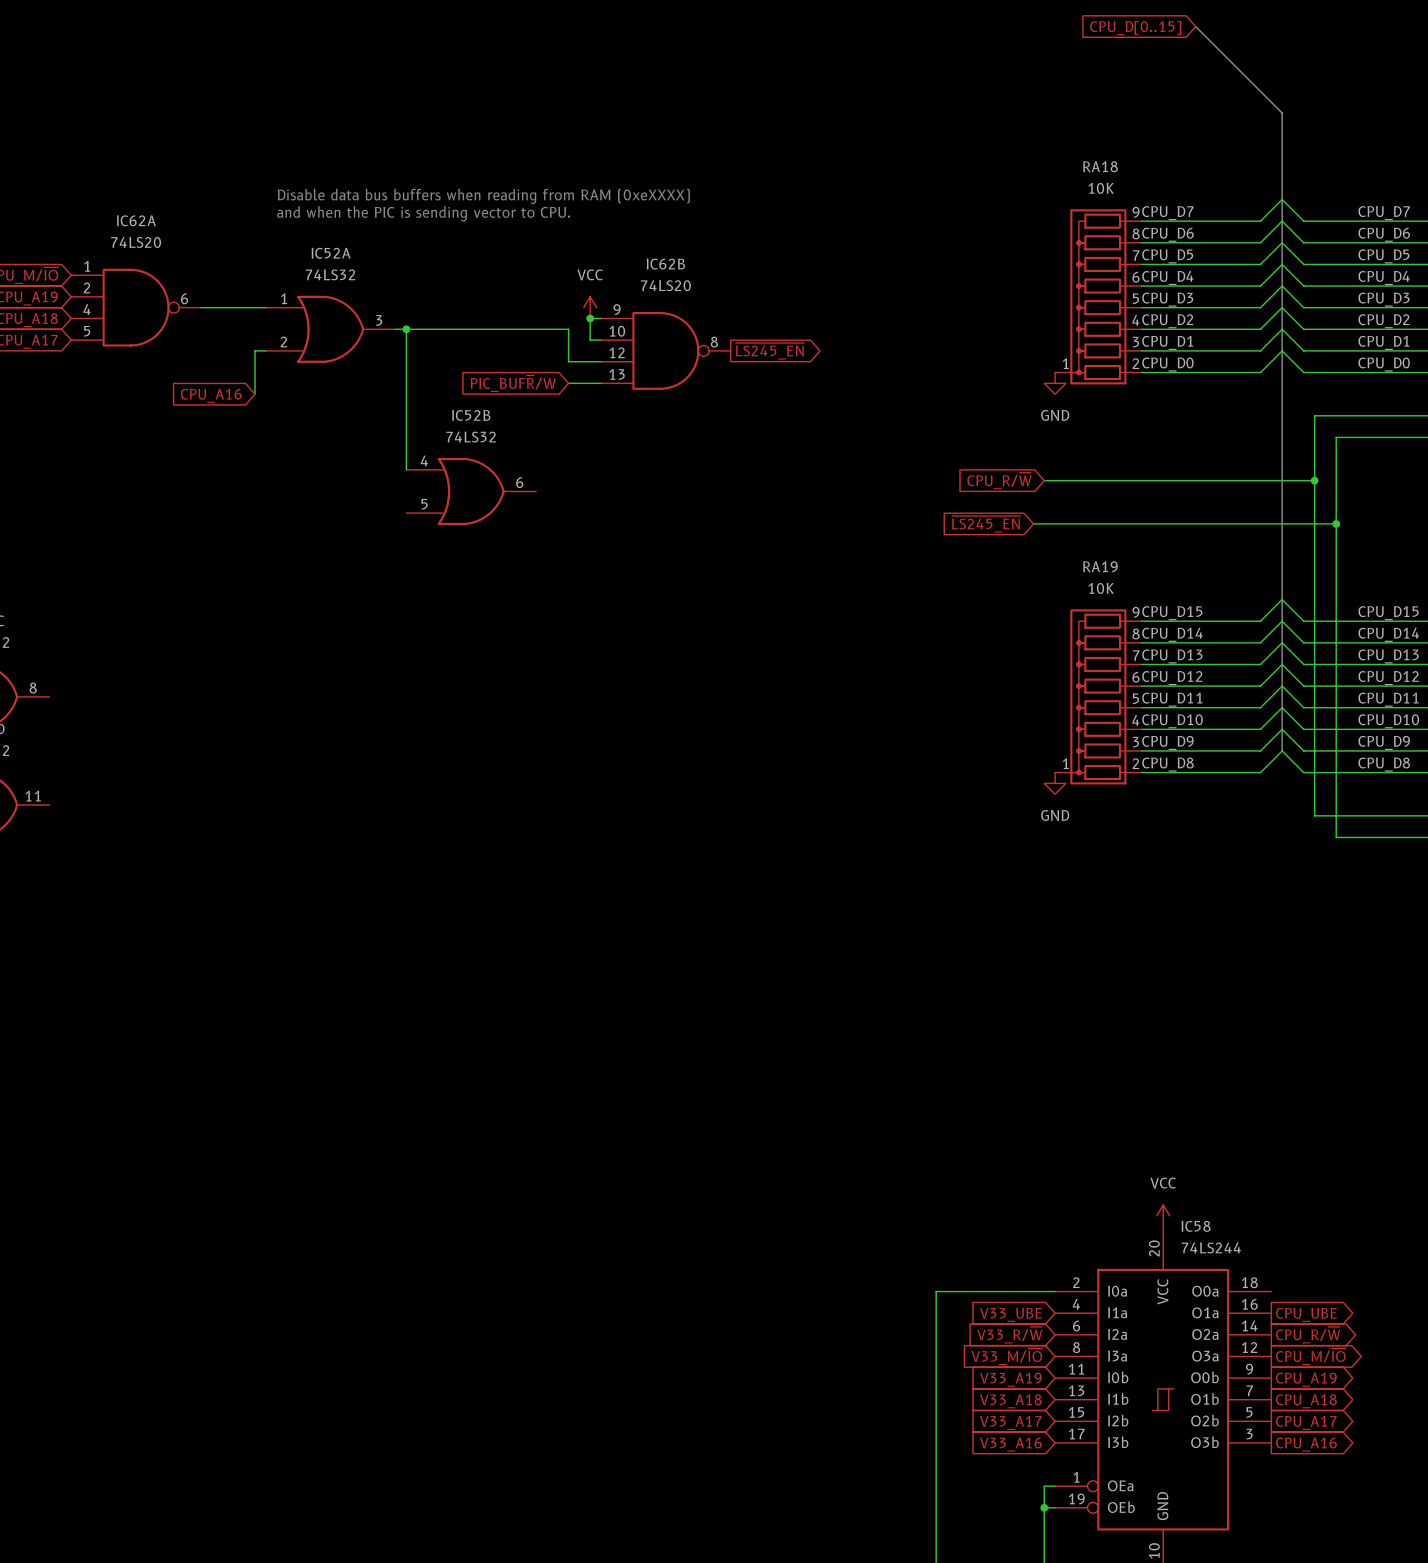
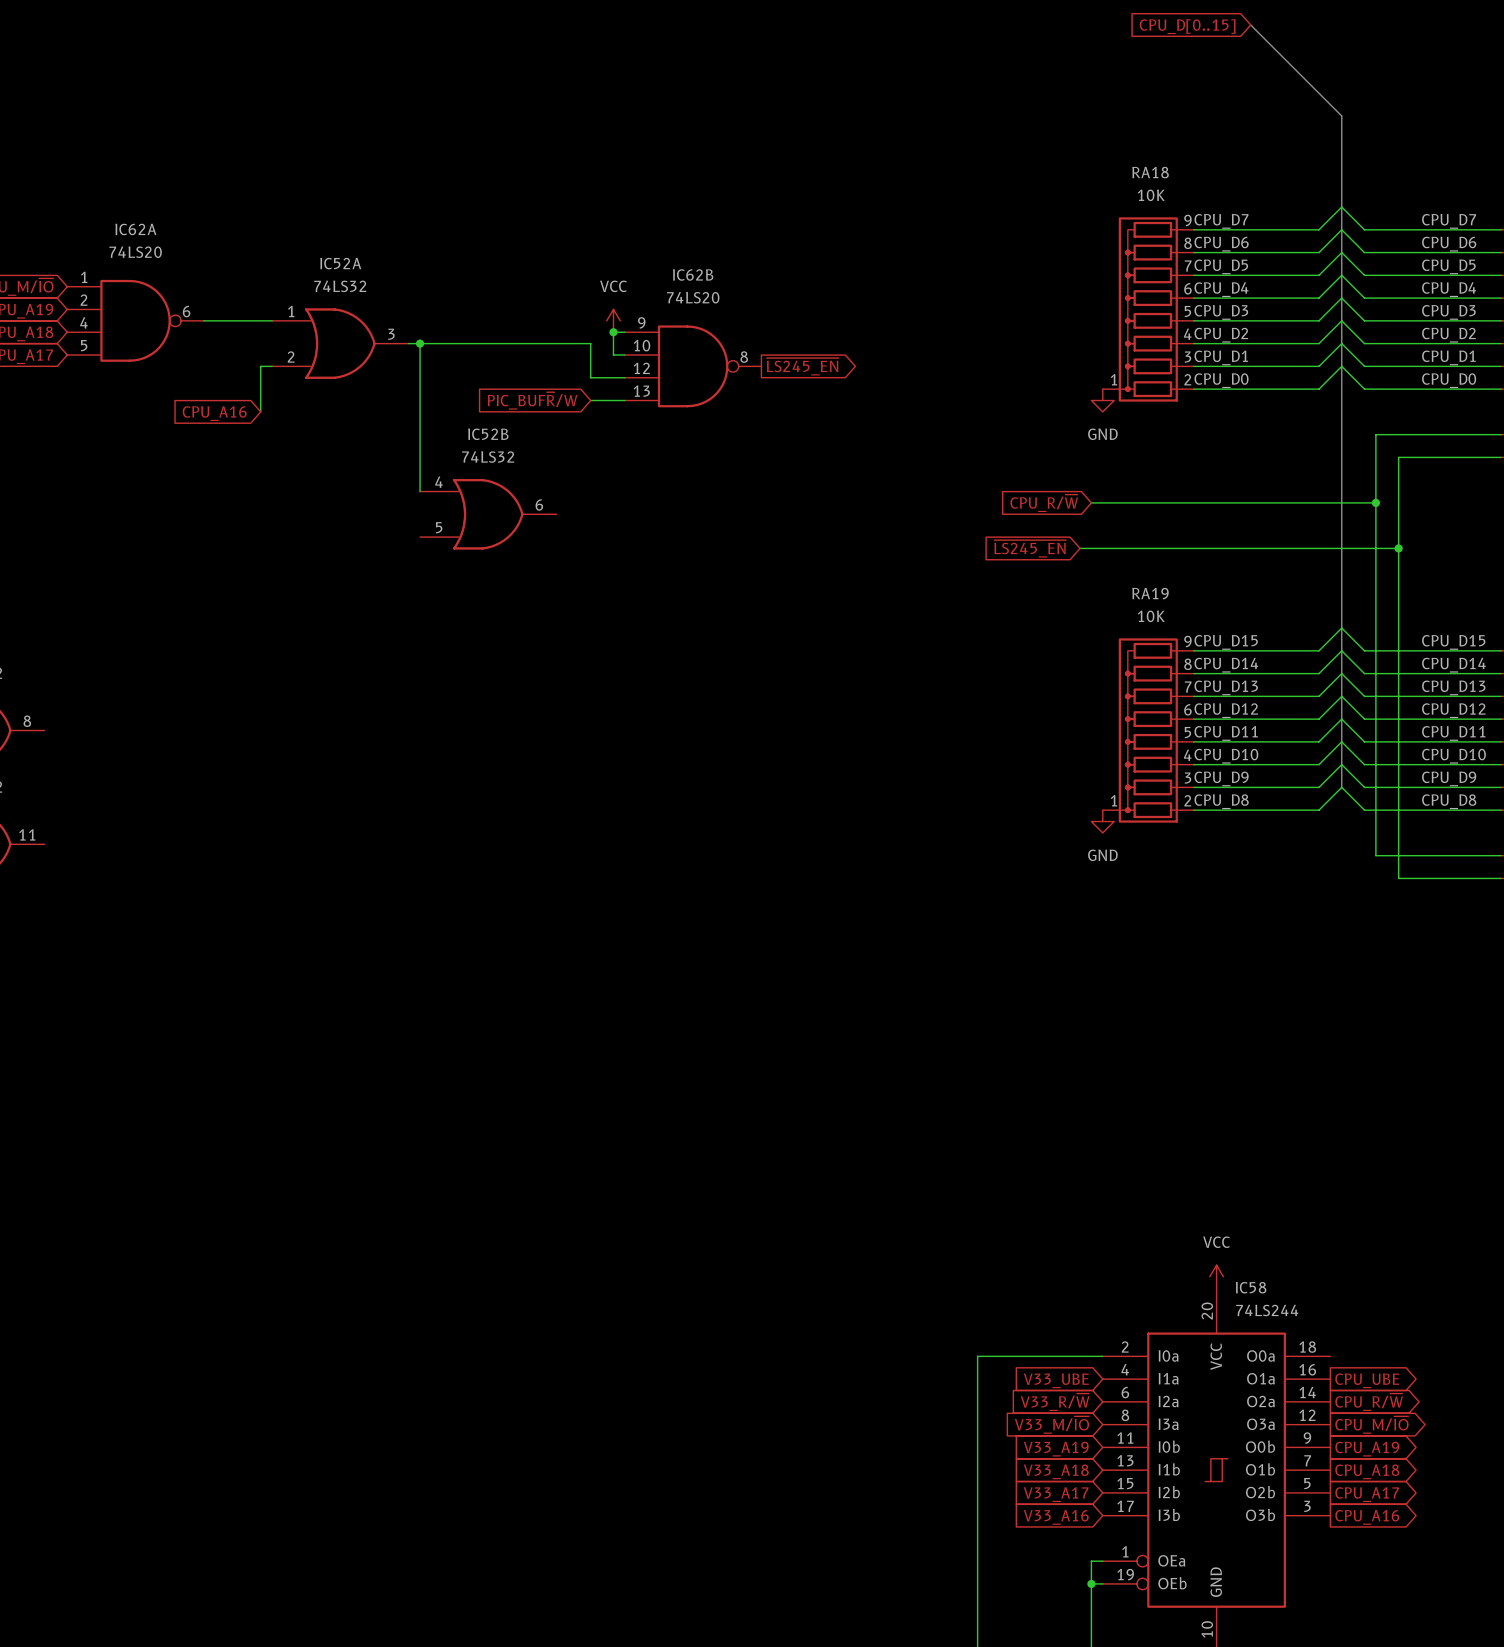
text: Disable data bus buffers when reading from RAM (0xeXXXX) (483, 196) -> none
text: and when the PIC is sending vector to CPU. (423, 213) -> none

